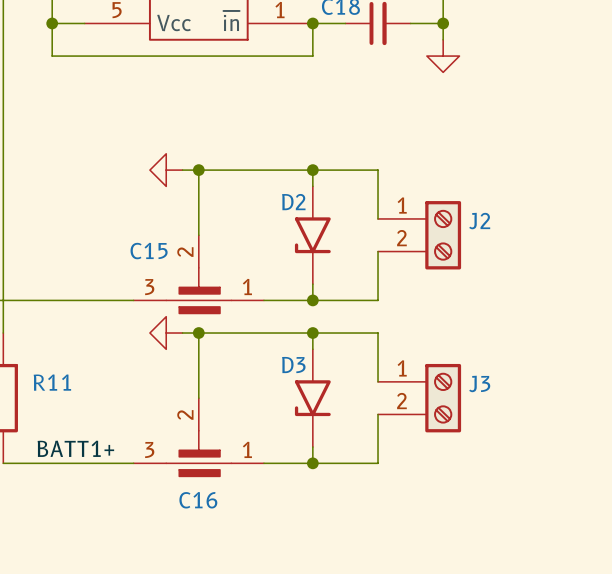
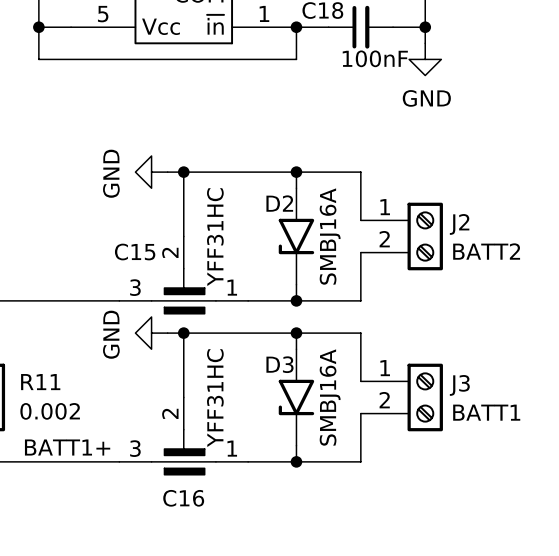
C18 value: none -> 100nF (375, 58)
power symbol text: none -> GND (426, 98)
power symbol text: none -> GND (111, 173)
D2 value: none -> SMBJ16A (330, 236)
C15 value: none -> YFF31HC (215, 237)
J2 value: none -> BATT2 (486, 251)
power symbol text: none -> GND (111, 334)
D3 value: none -> SMBJ16A (330, 397)
C16 value: none -> YFF31HC (215, 398)
R11 value: none -> 0.002 (50, 411)
J3 value: none -> BATT1 (486, 412)

